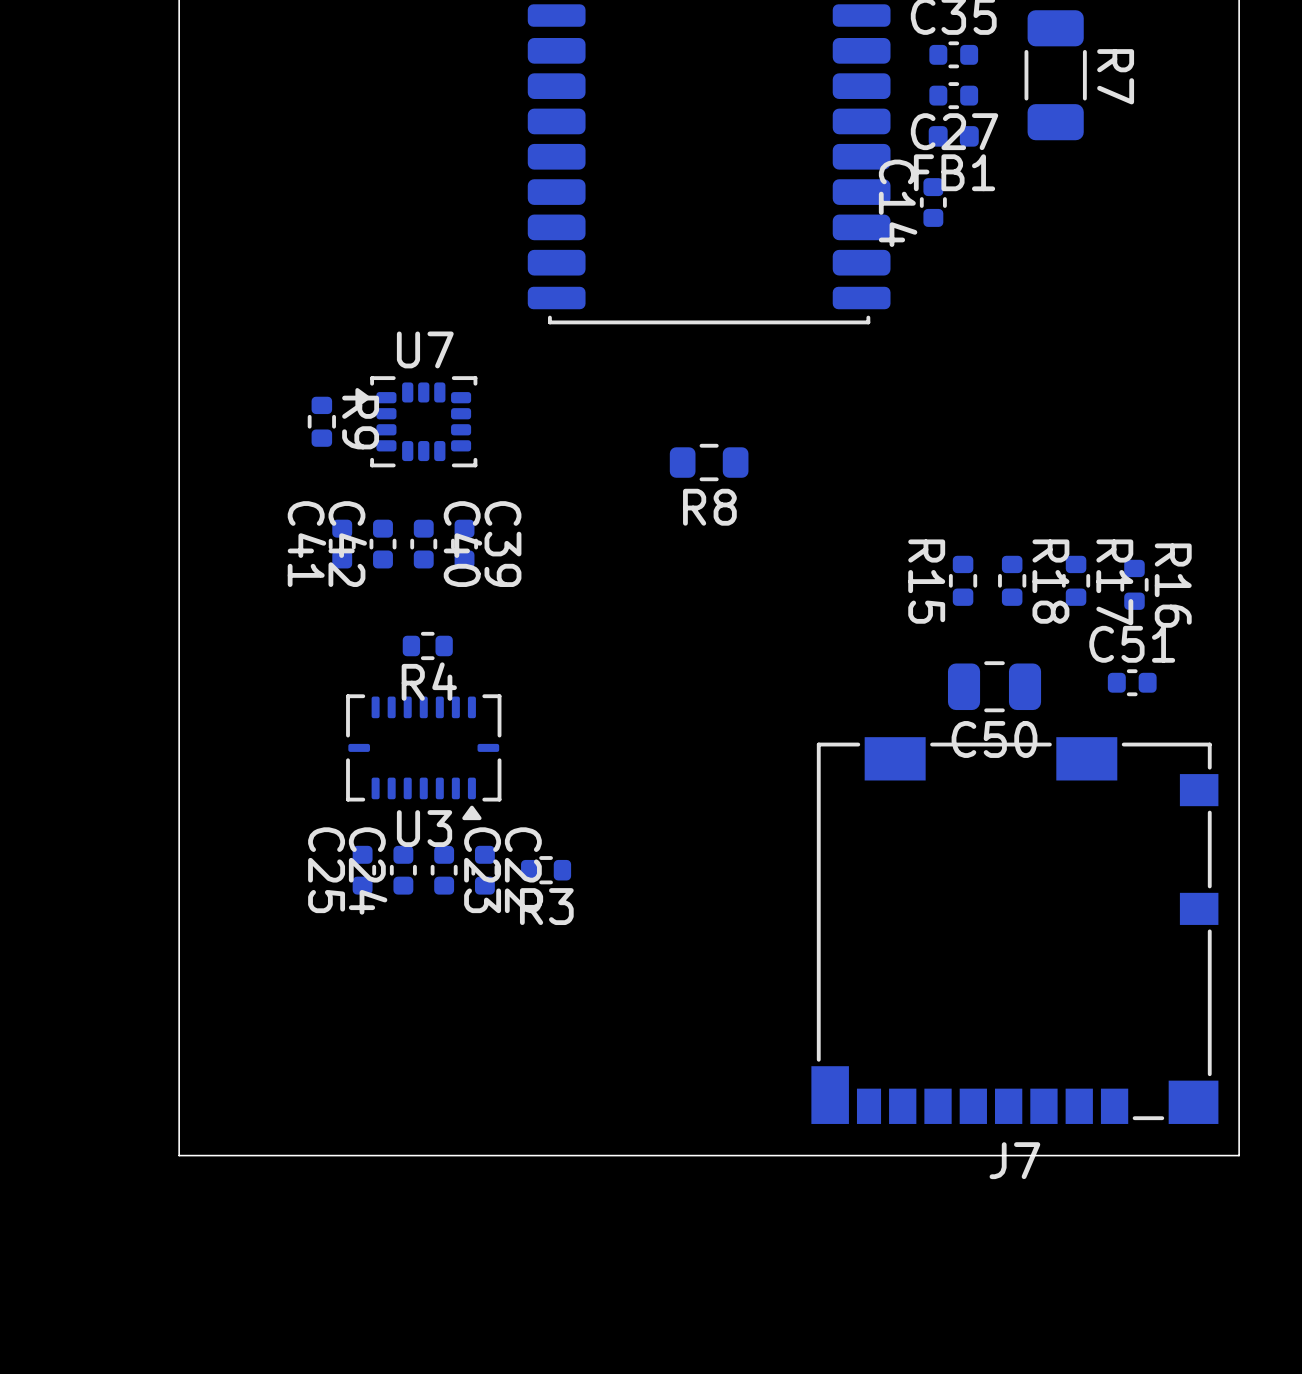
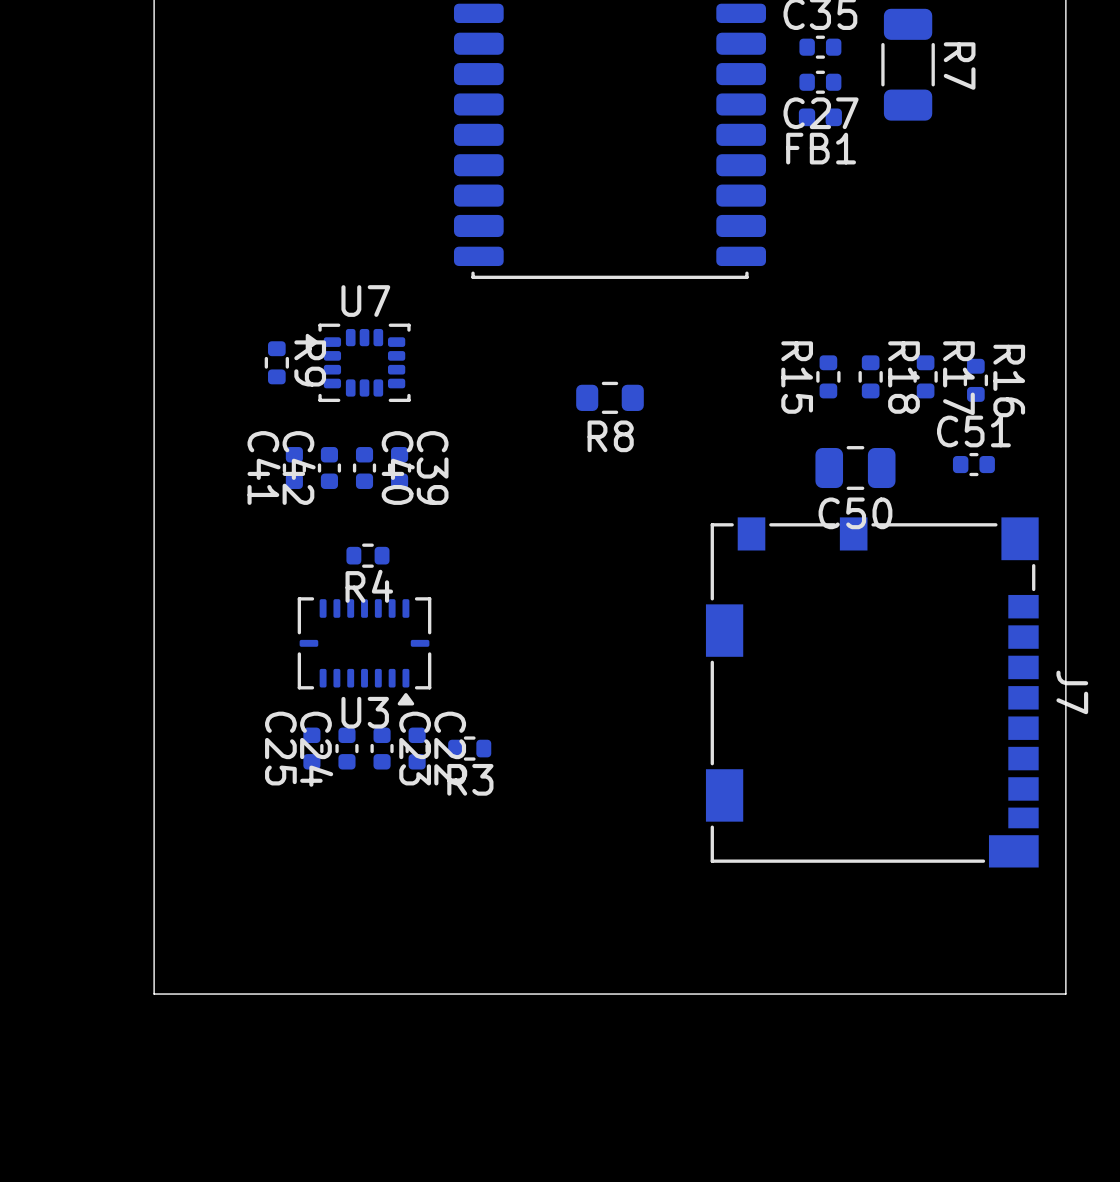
C14: (933, 202) -> none
R15 position: (963, 580) -> (828, 376)
R18 position: (1012, 580) -> (870, 376)
R17 position: (1076, 580) -> (925, 376)
R16 position: (1134, 584) -> (975, 380)
C51 position: (1132, 682) -> (973, 464)
C50 position: (994, 686) -> (855, 468)
J7 rotation: 0° (1014, 930) -> 90° counterclockwise (872, 692)

